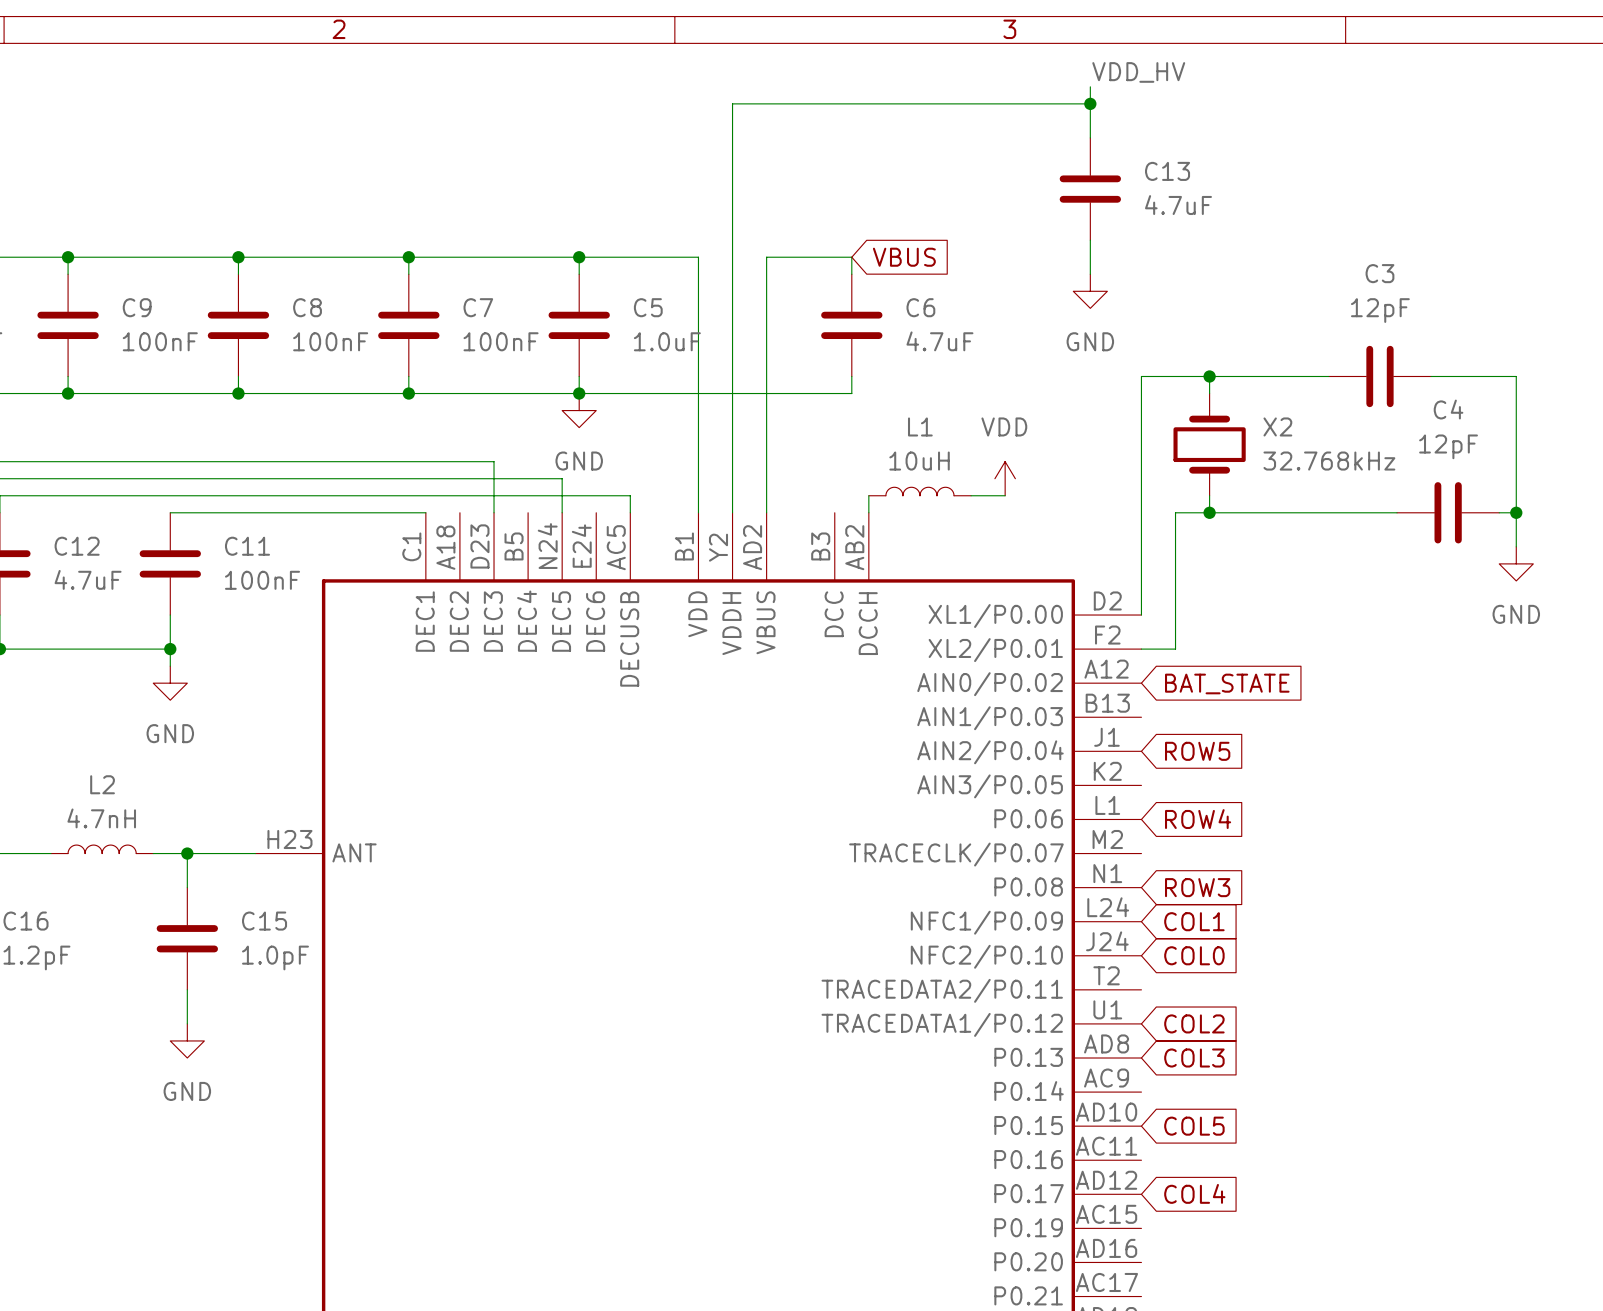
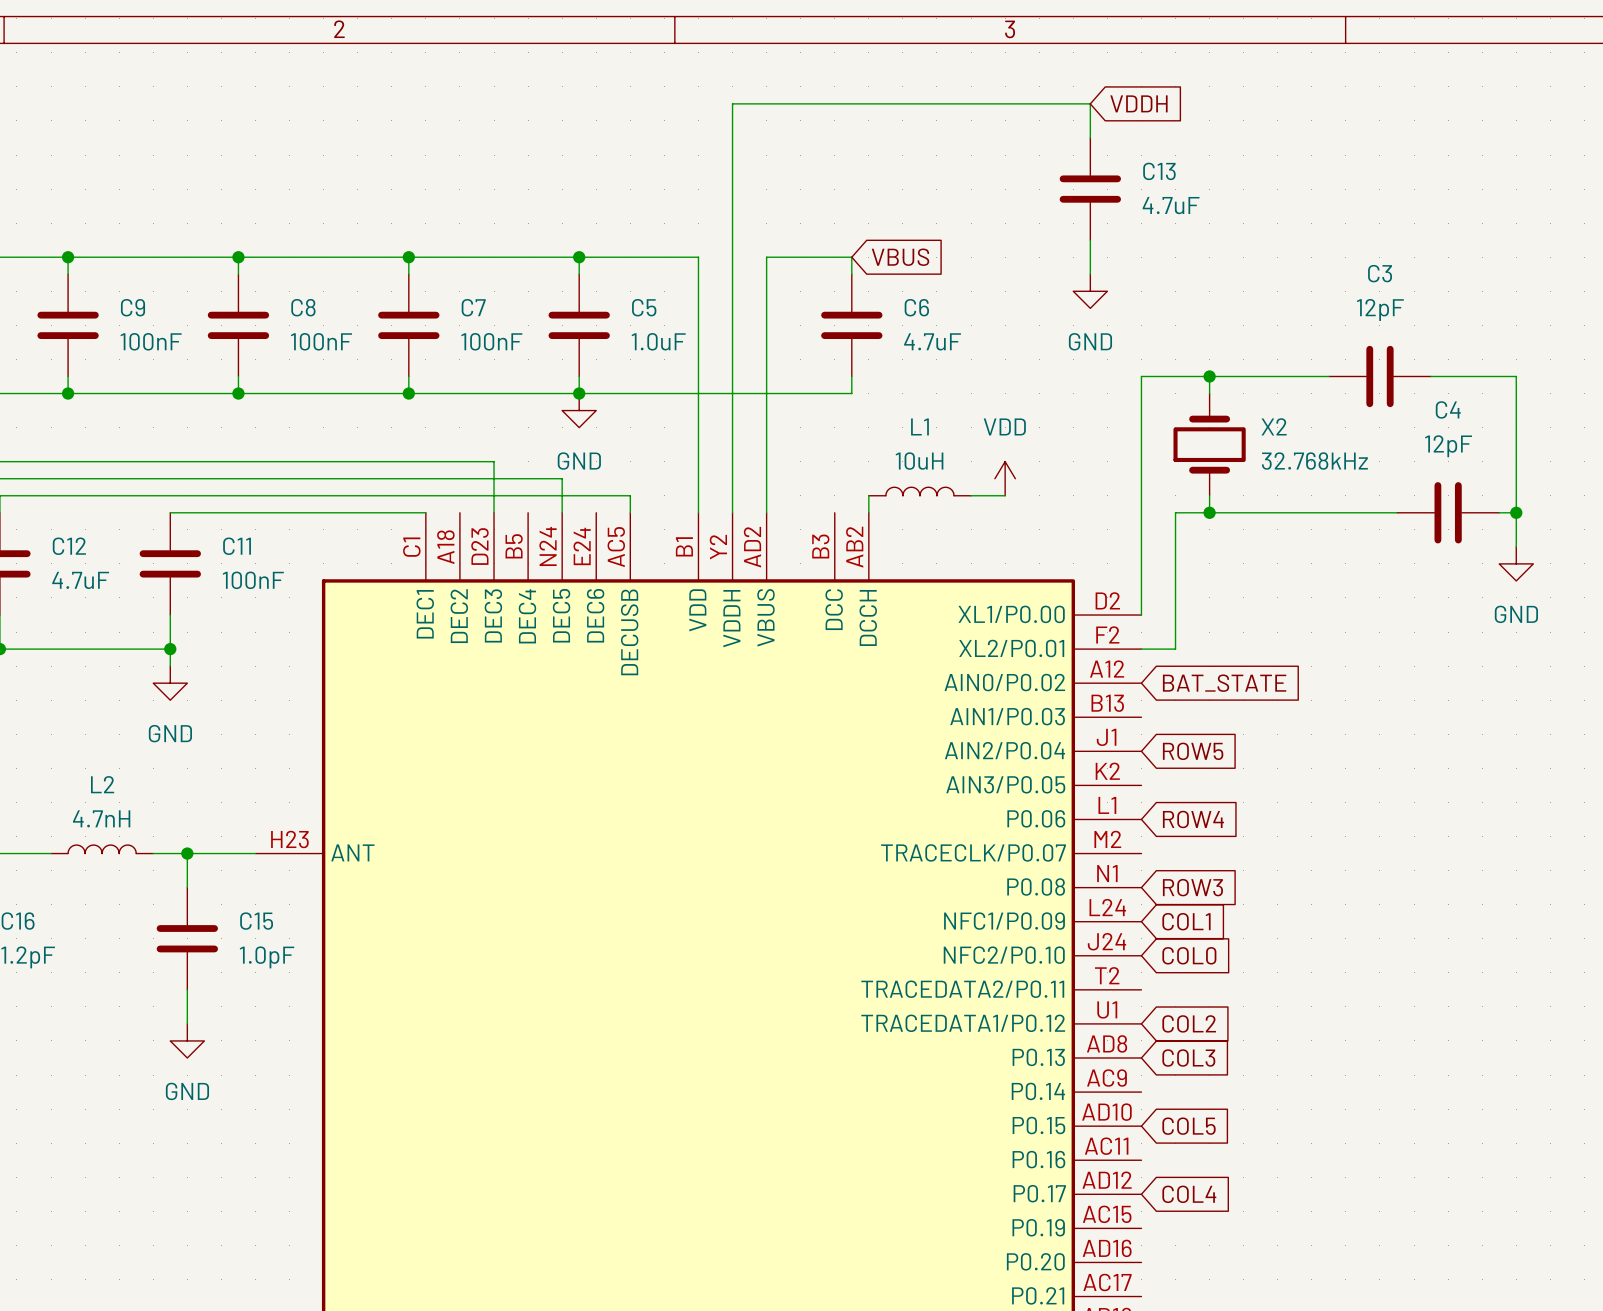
label: VDD_HV (1138, 72) -> none
wire: (1090, 86) (1090, 103) -> none
junction: (1090, 103) -> none
global label: none -> VDDH (1138, 103)

